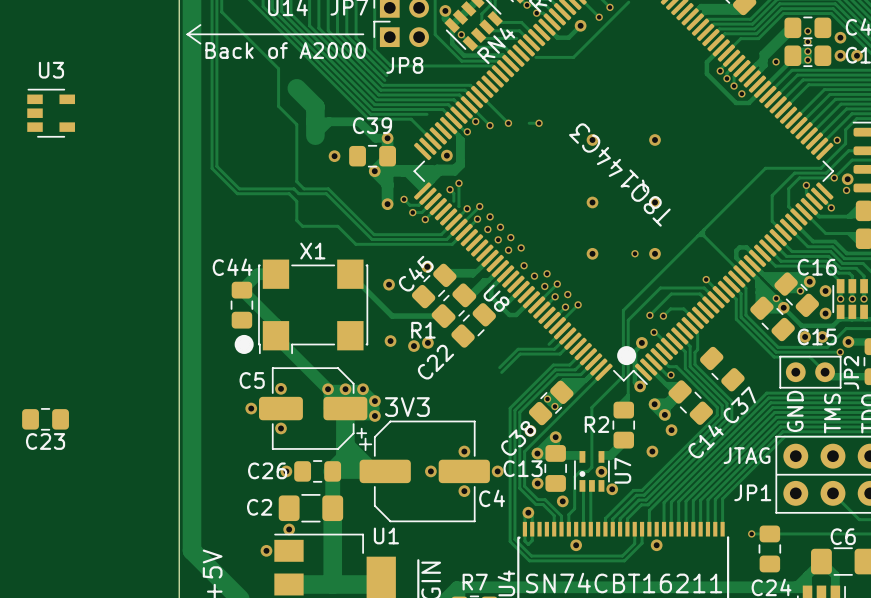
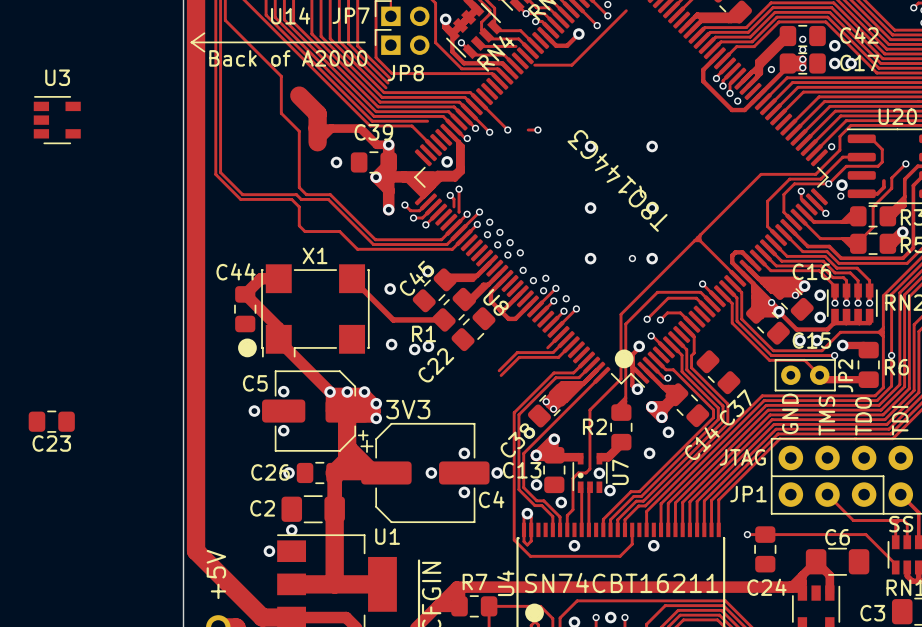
track: (583, 351) (569, 365) (553, 365) (510, 408) (510, 541) (529, 560) (624, 560) (642, 543) (642, 529) -> none

